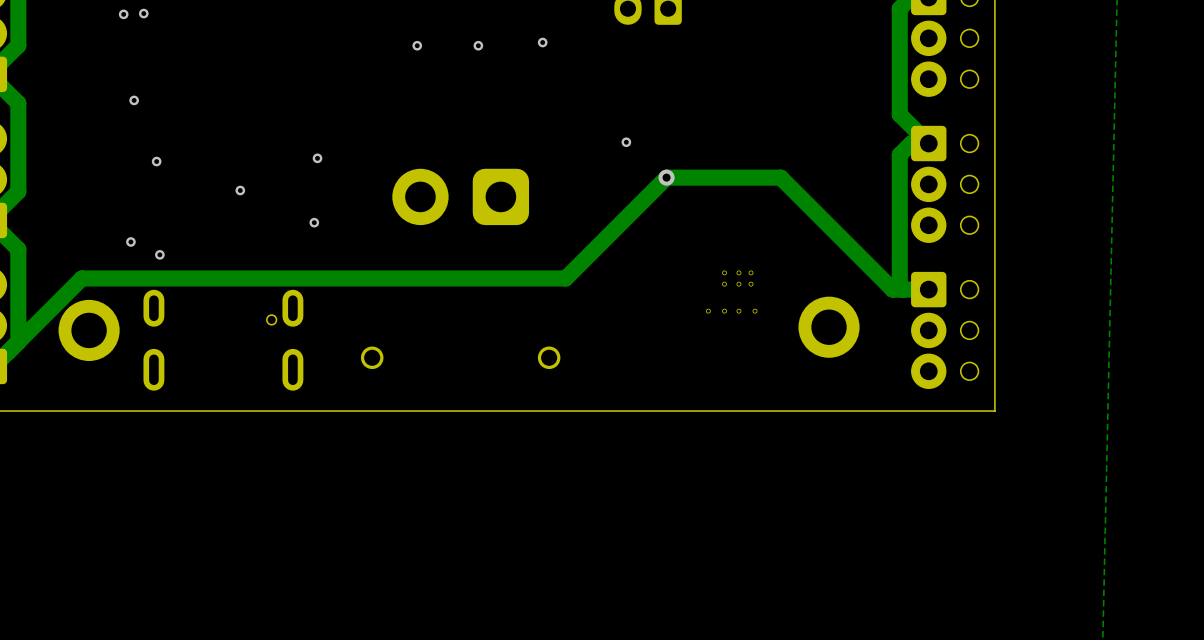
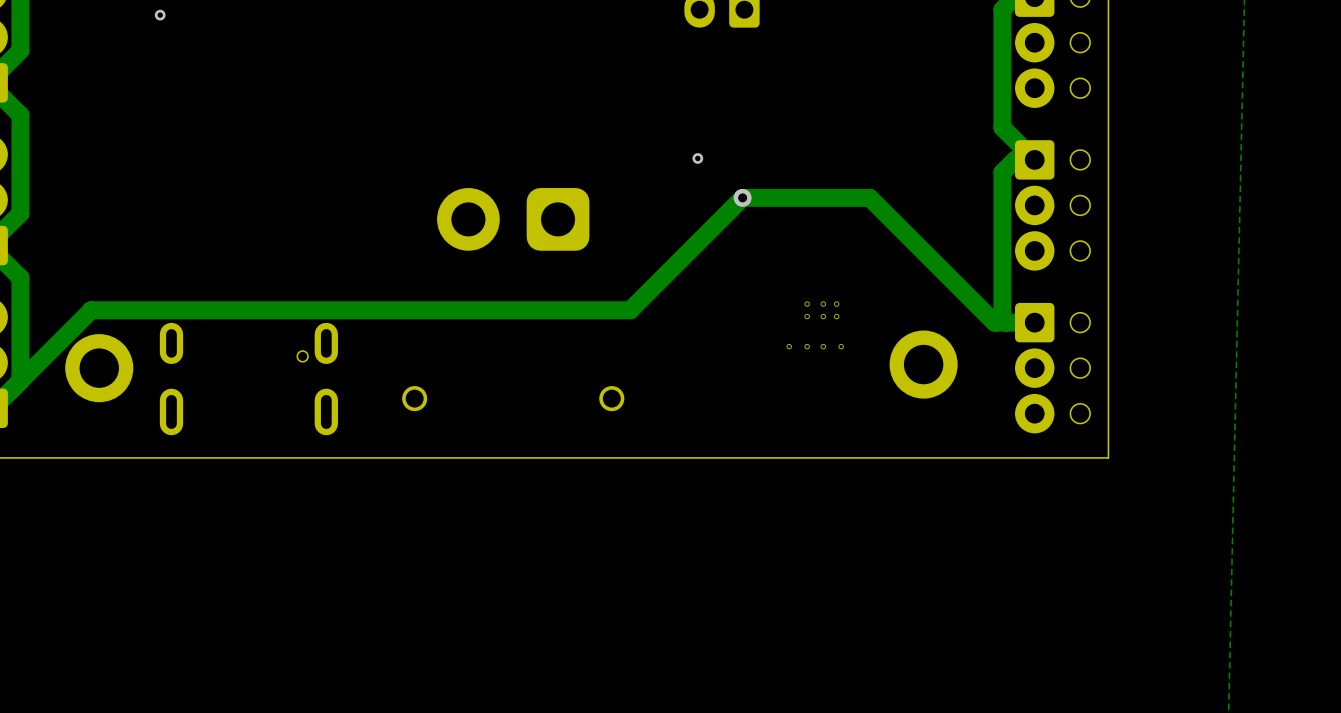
via: (123, 14) -> none
via: (542, 42) -> none
via: (417, 45) -> none
via: (478, 45) -> none
via: (134, 100) -> none
via: (317, 158) -> none
via: (156, 161) -> none
via: (240, 190) -> none
via: (314, 222) -> none
via: (130, 241) -> none
via: (159, 254) -> none

